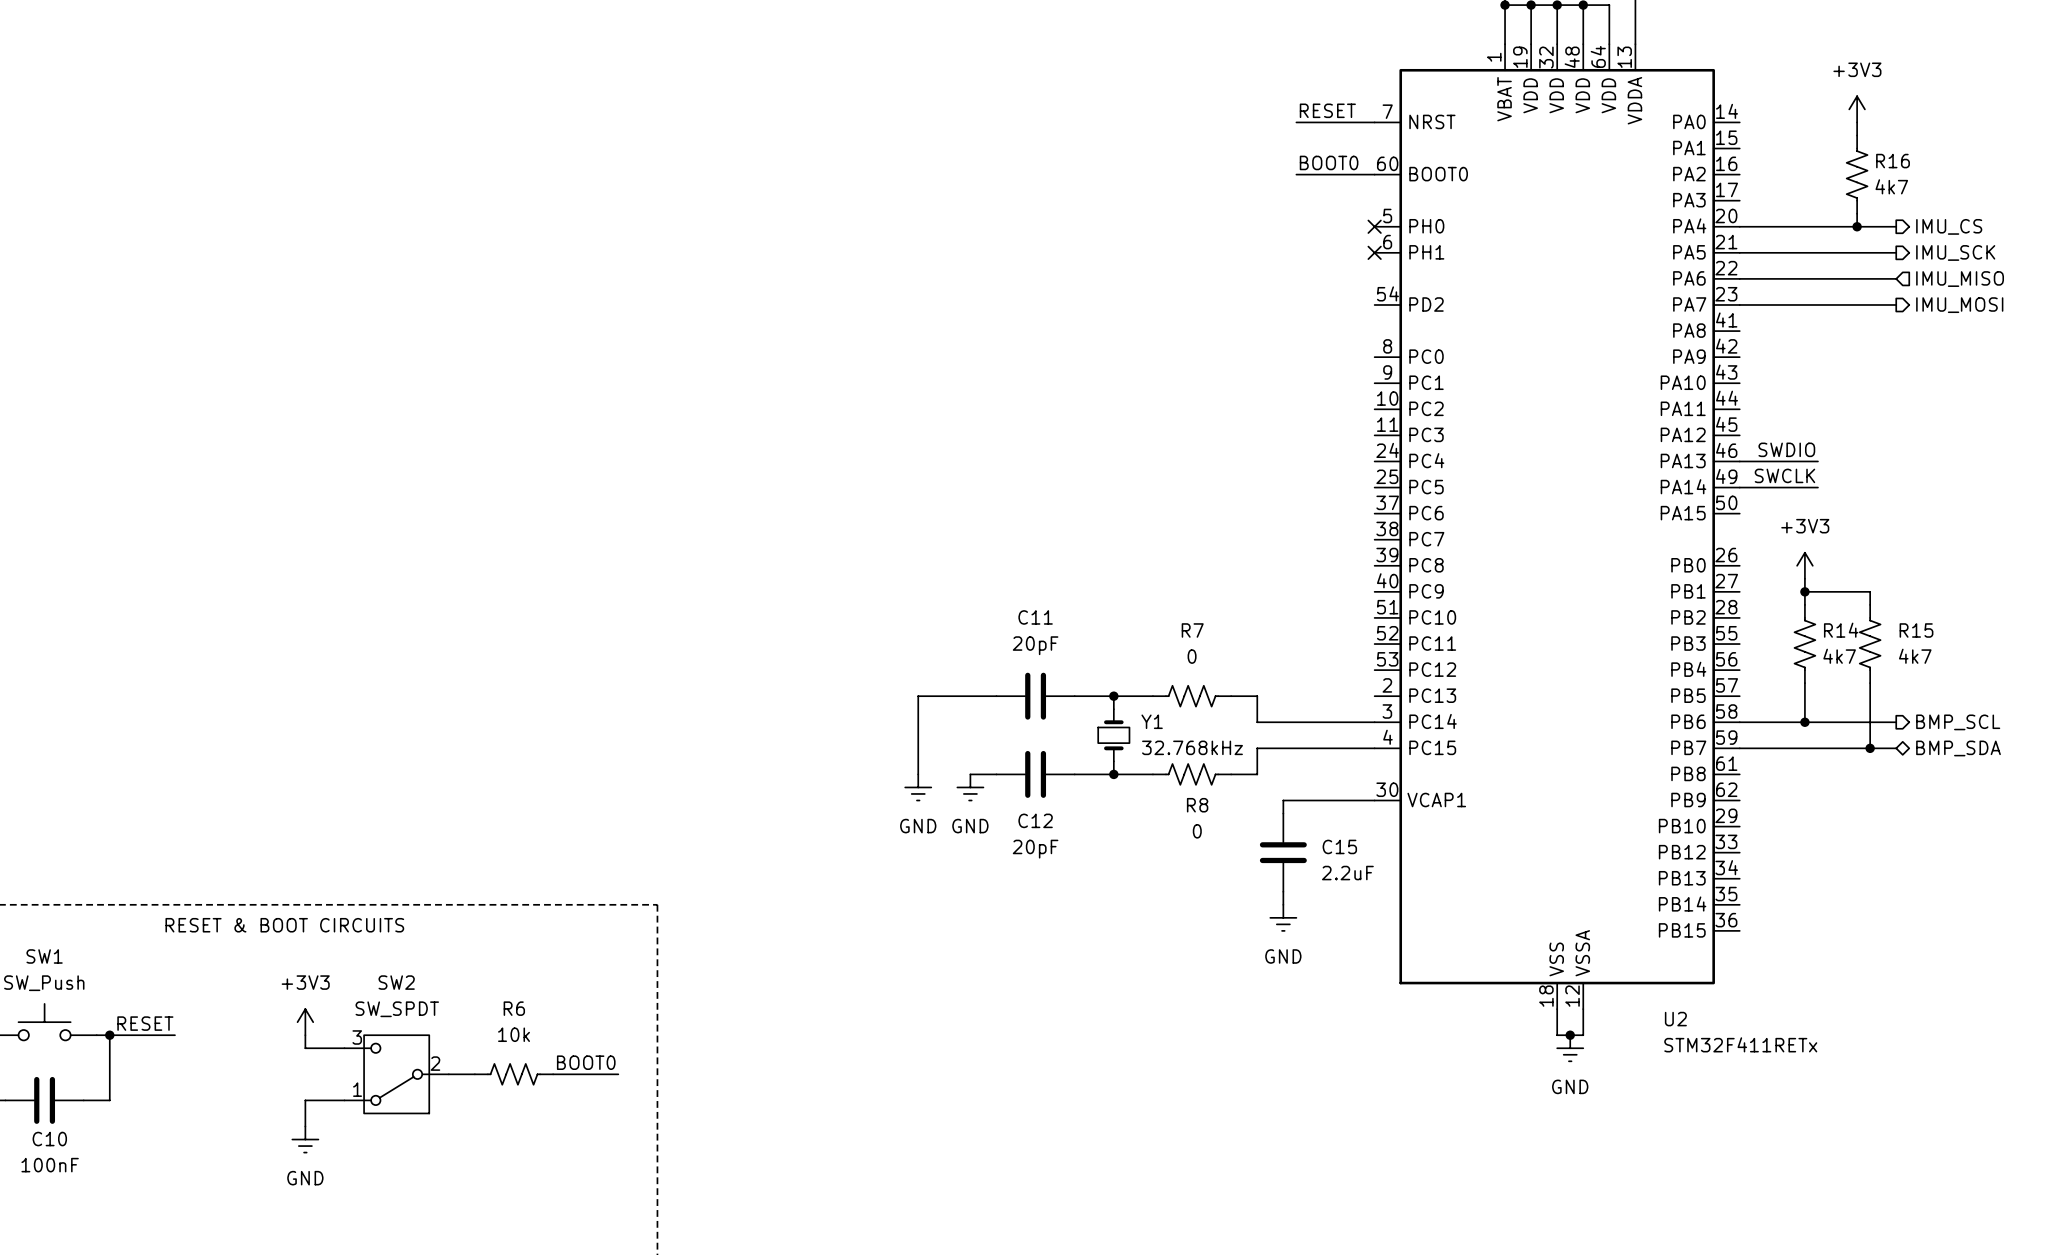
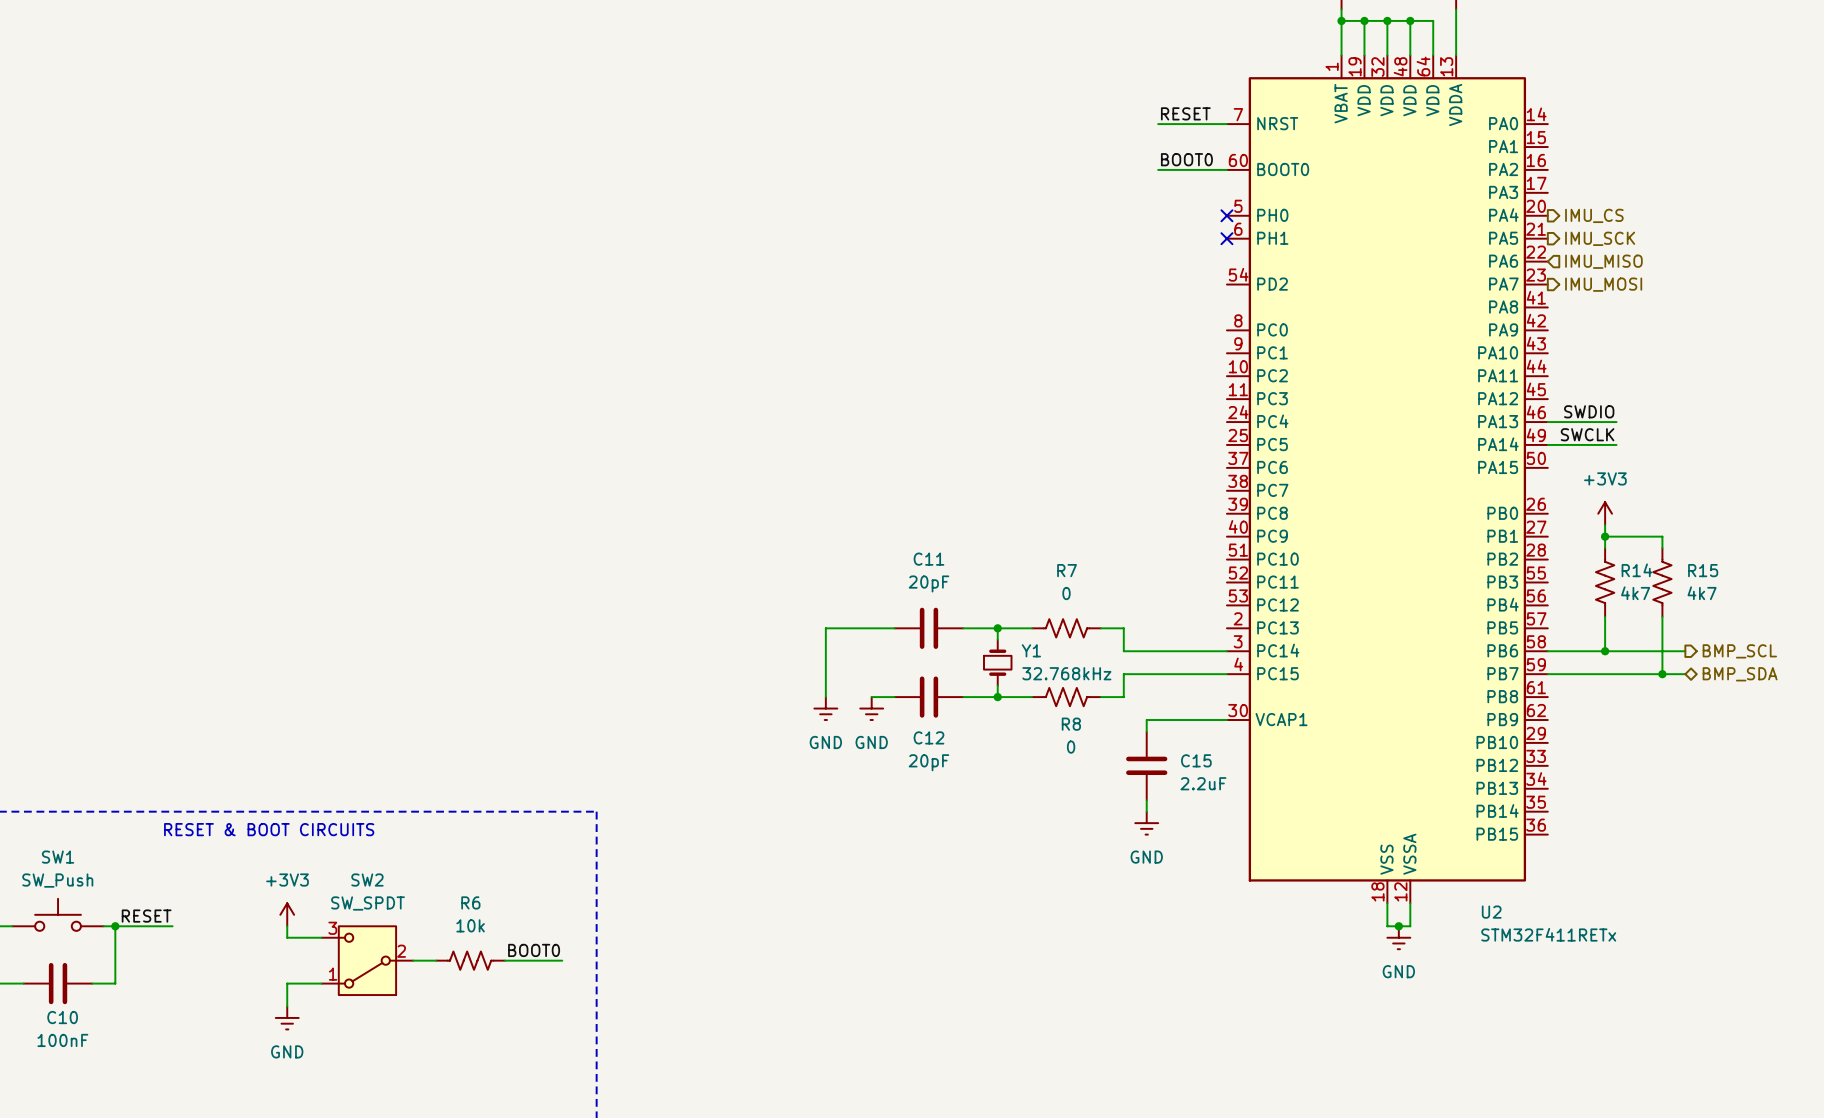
power symbol: +3V3 (1857, 109) -> none
wire: (1857, 122) (1857, 135) -> none
R16: 4k7 (1857, 174) -> none
wire: (1857, 213) (1857, 226) -> none
wire: (1739, 226) (1896, 226) -> none
junction: (1857, 226) -> none
hierarchical label position: IMU_CS (1949, 226) -> IMU_CS (1594, 215)
wire: (1739, 252) (1896, 252) -> none
hierarchical label position: IMU_SCK (1955, 252) -> IMU_SCK (1600, 238)
wire: (1739, 278) (1896, 278) -> none
hierarchical label position: IMU_MISO (1960, 279) -> IMU_MISO (1603, 261)
wire: (1739, 304) (1896, 304) -> none
hierarchical label position: IMU_MOSI (1959, 305) -> IMU_MOSI (1603, 284)

